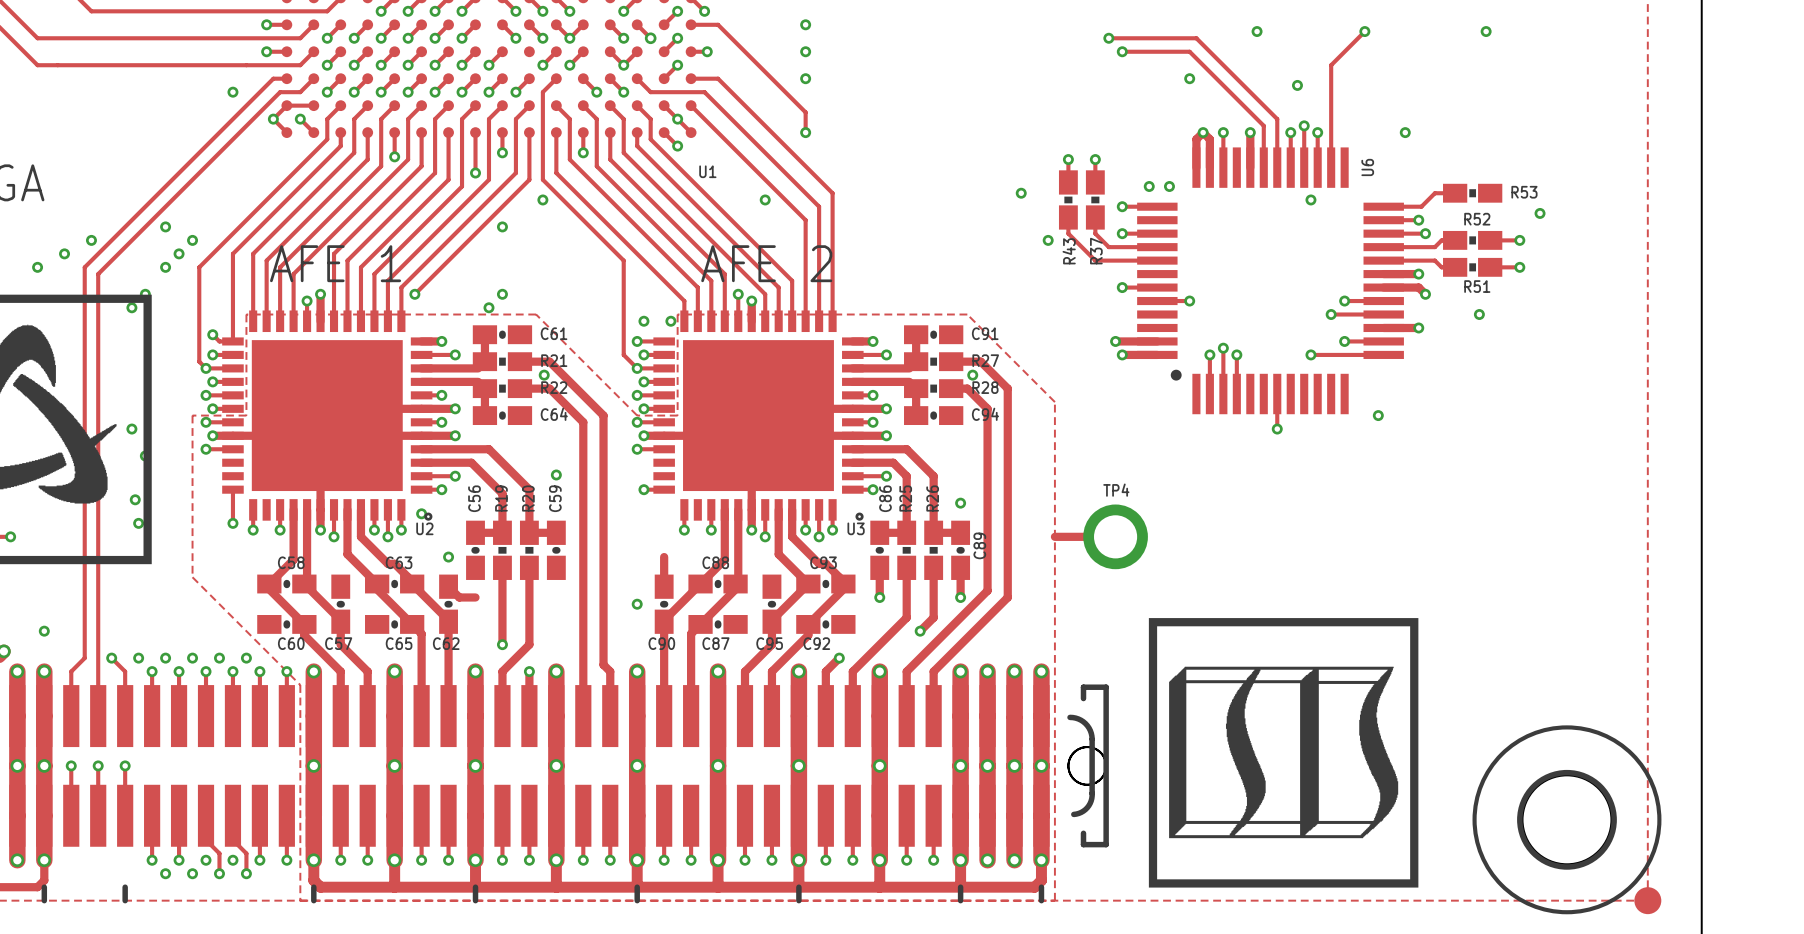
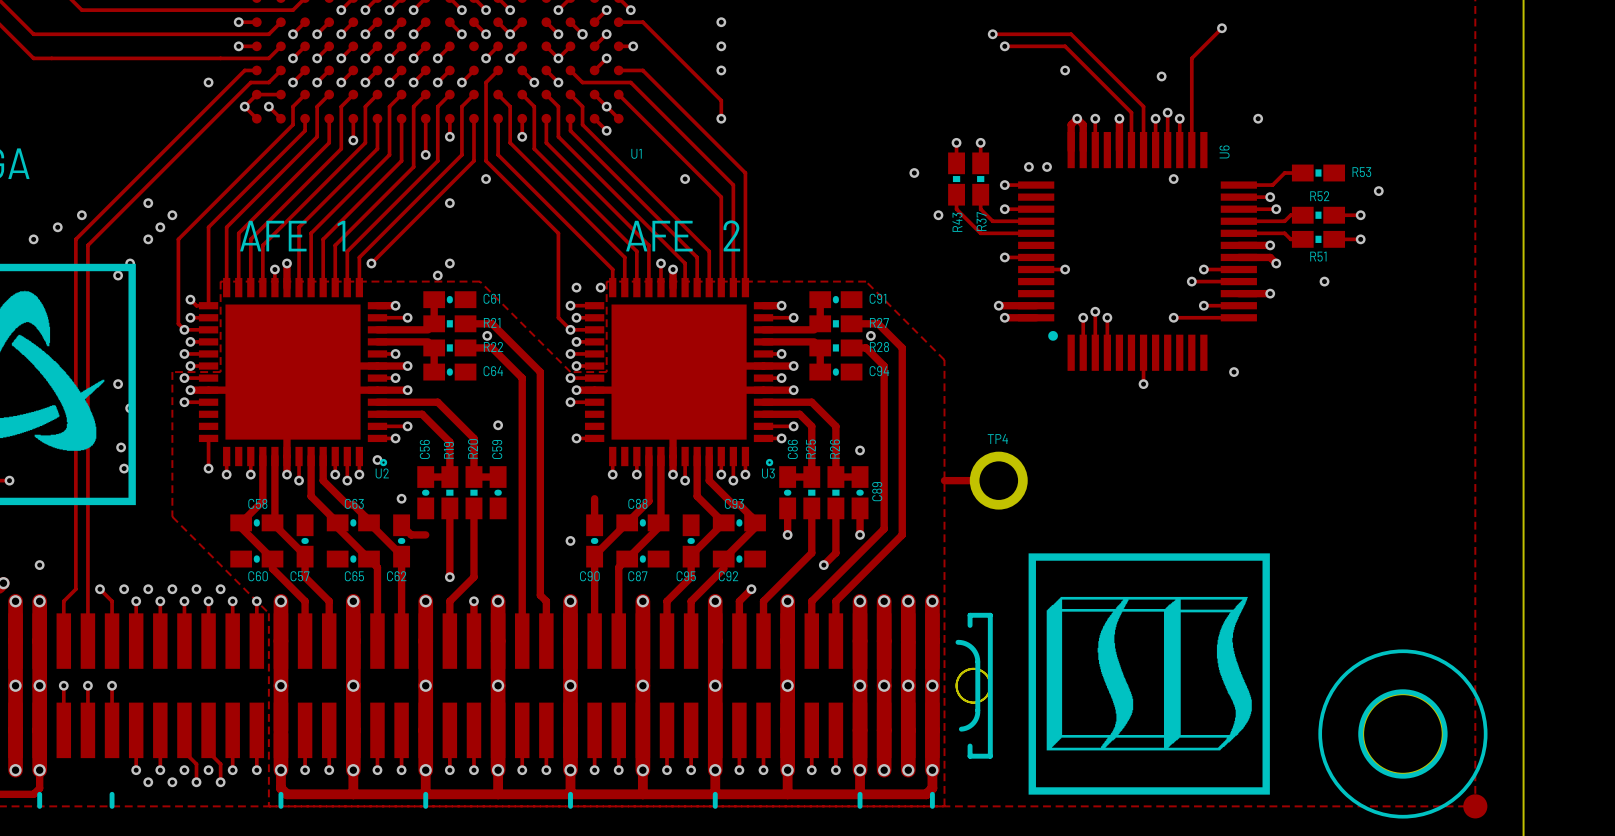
via: (1257, 31) -> none
via: (1486, 31) -> none

